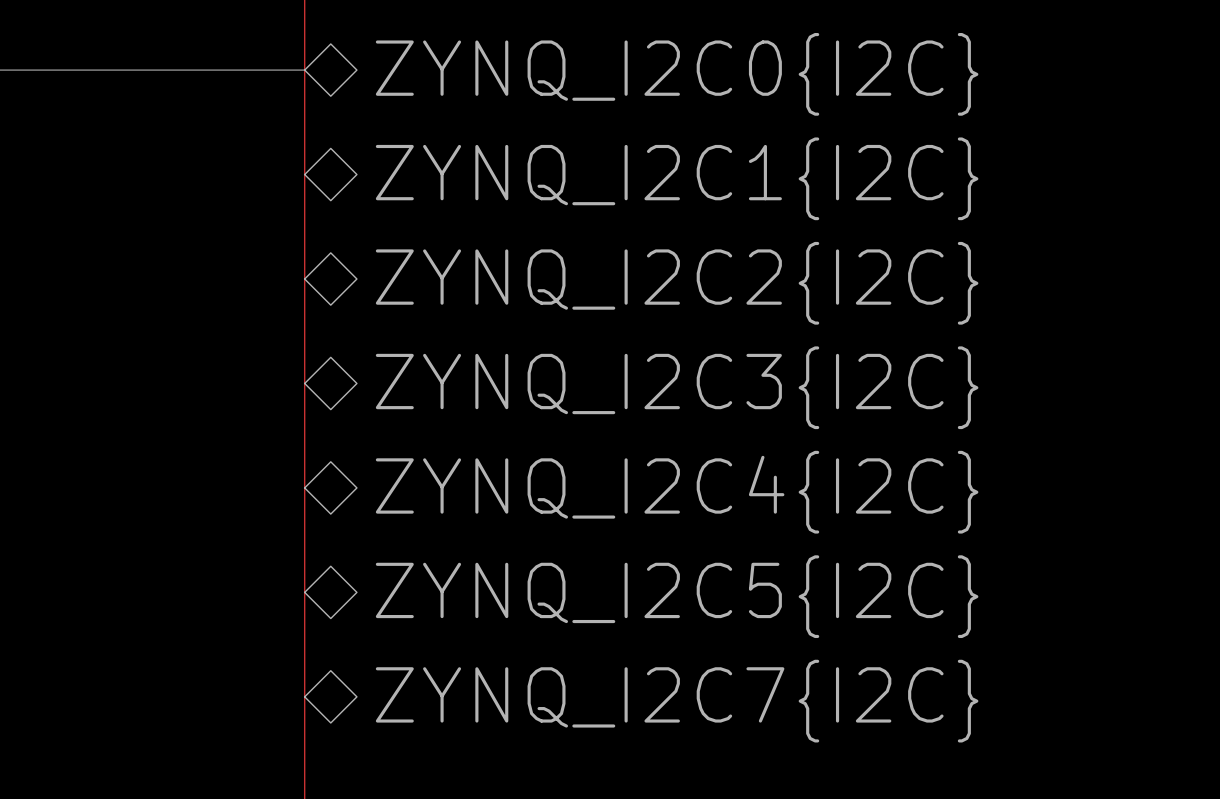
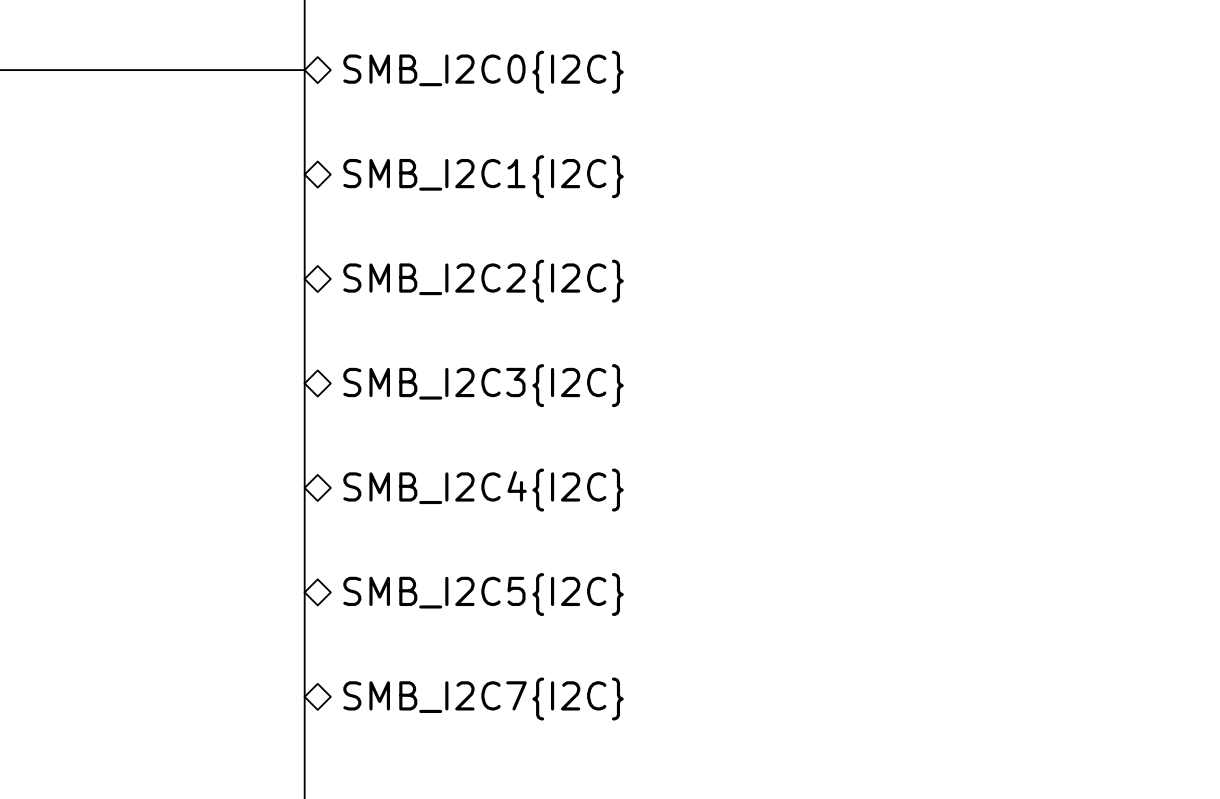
sheet pin: ZYNQ_I2C0{I2C} (677, 74) -> SMB_I2C0{I2C} (483, 72)
sheet pin: ZYNQ_I2C1{I2C} (677, 178) -> SMB_I2C1{I2C} (483, 176)
sheet pin: ZYNQ_I2C2{I2C} (677, 283) -> SMB_I2C2{I2C} (483, 281)
sheet pin: ZYNQ_I2C3{I2C} (677, 387) -> SMB_I2C3{I2C} (483, 385)
sheet pin: ZYNQ_I2C4{I2C} (677, 492) -> SMB_I2C4{I2C} (483, 490)
sheet pin: ZYNQ_I2C5{I2C} (677, 596) -> SMB_I2C5{I2C} (483, 594)
sheet pin: ZYNQ_I2C7{I2C} (677, 701) -> SMB_I2C7{I2C} (483, 698)

